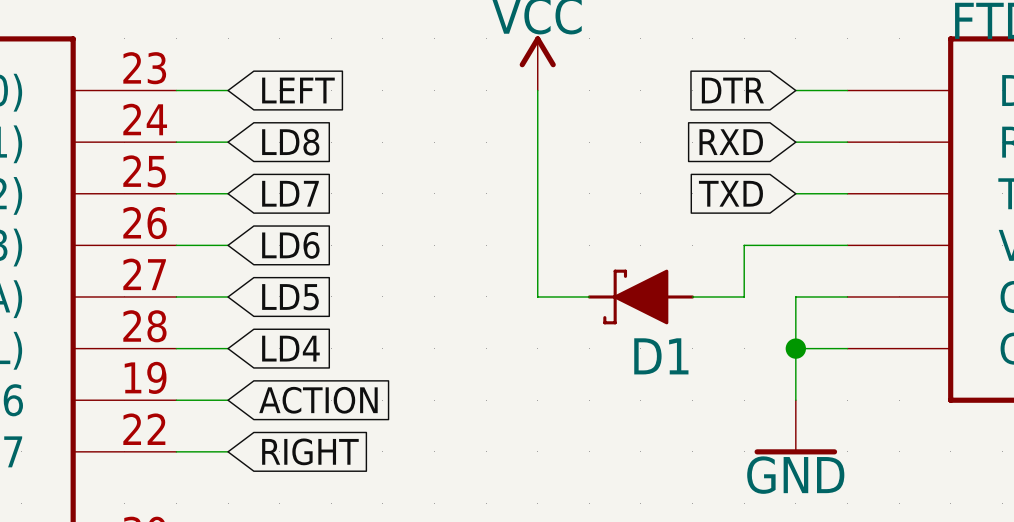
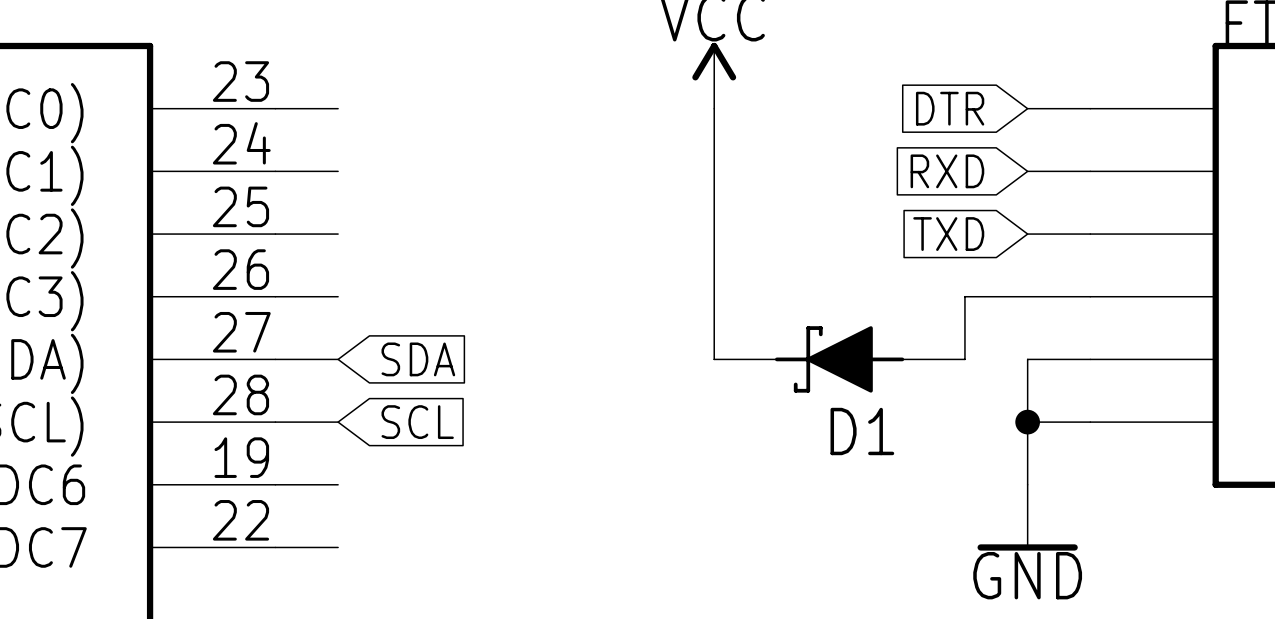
global label: LEFT (298, 90) -> none
global label: LD8 (290, 142) -> none
global label: LD7 (290, 193) -> none
global label: LD6 (290, 245) -> none
global label: LD5 (290, 297) -> SDA (418, 359)
global label: LD4 (290, 348) -> SCL (417, 422)
global label: ACTION (318, 400) -> none
global label: RIGHT (310, 451) -> none

